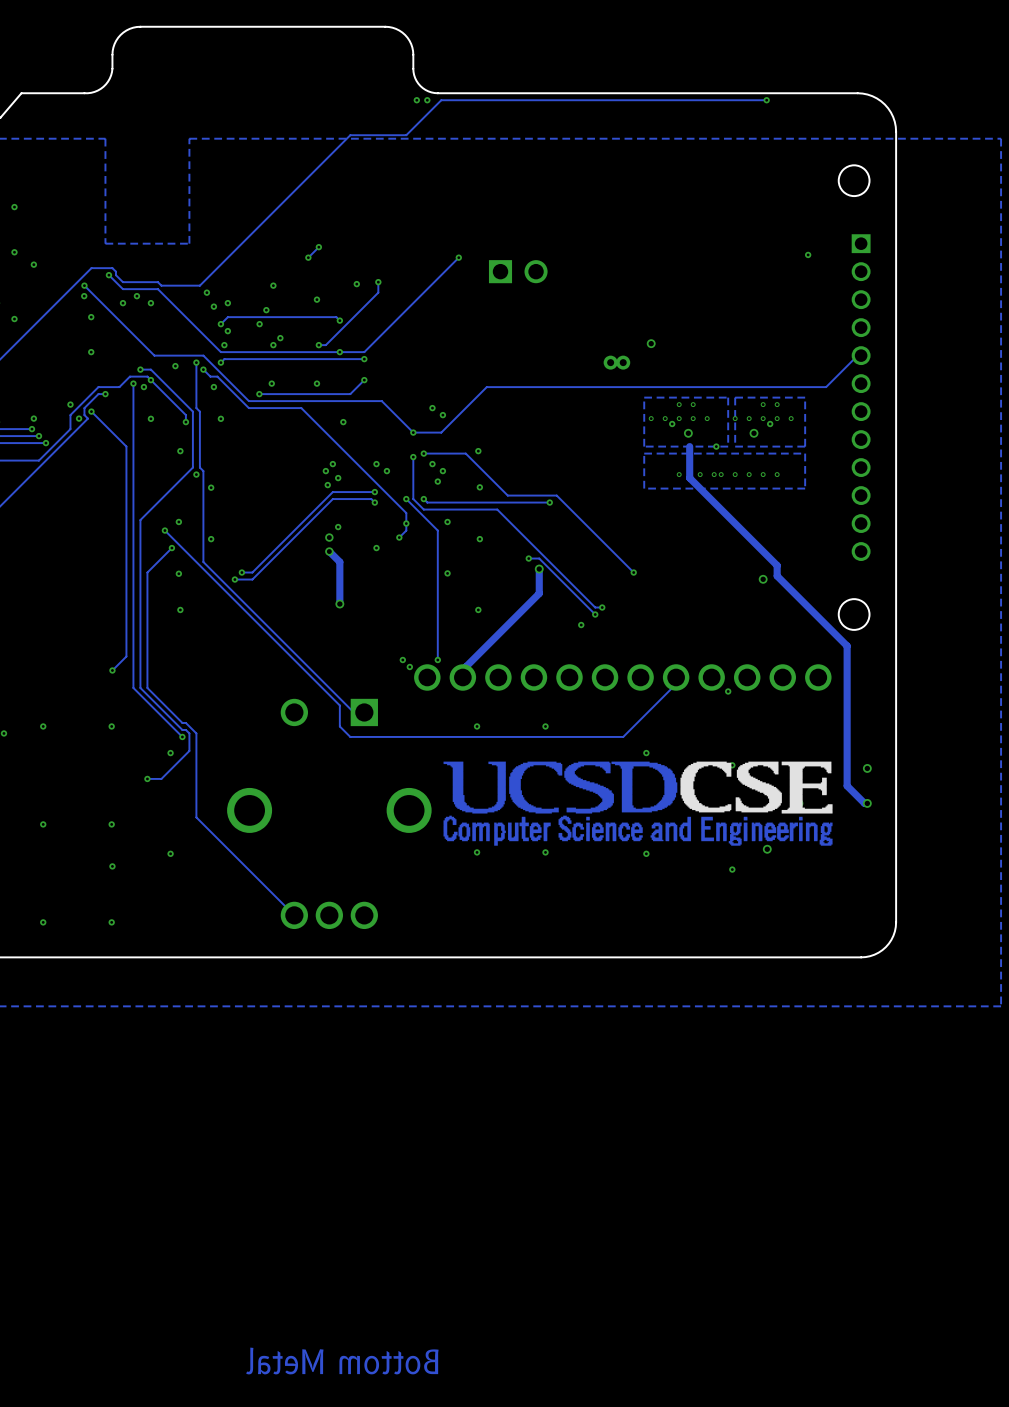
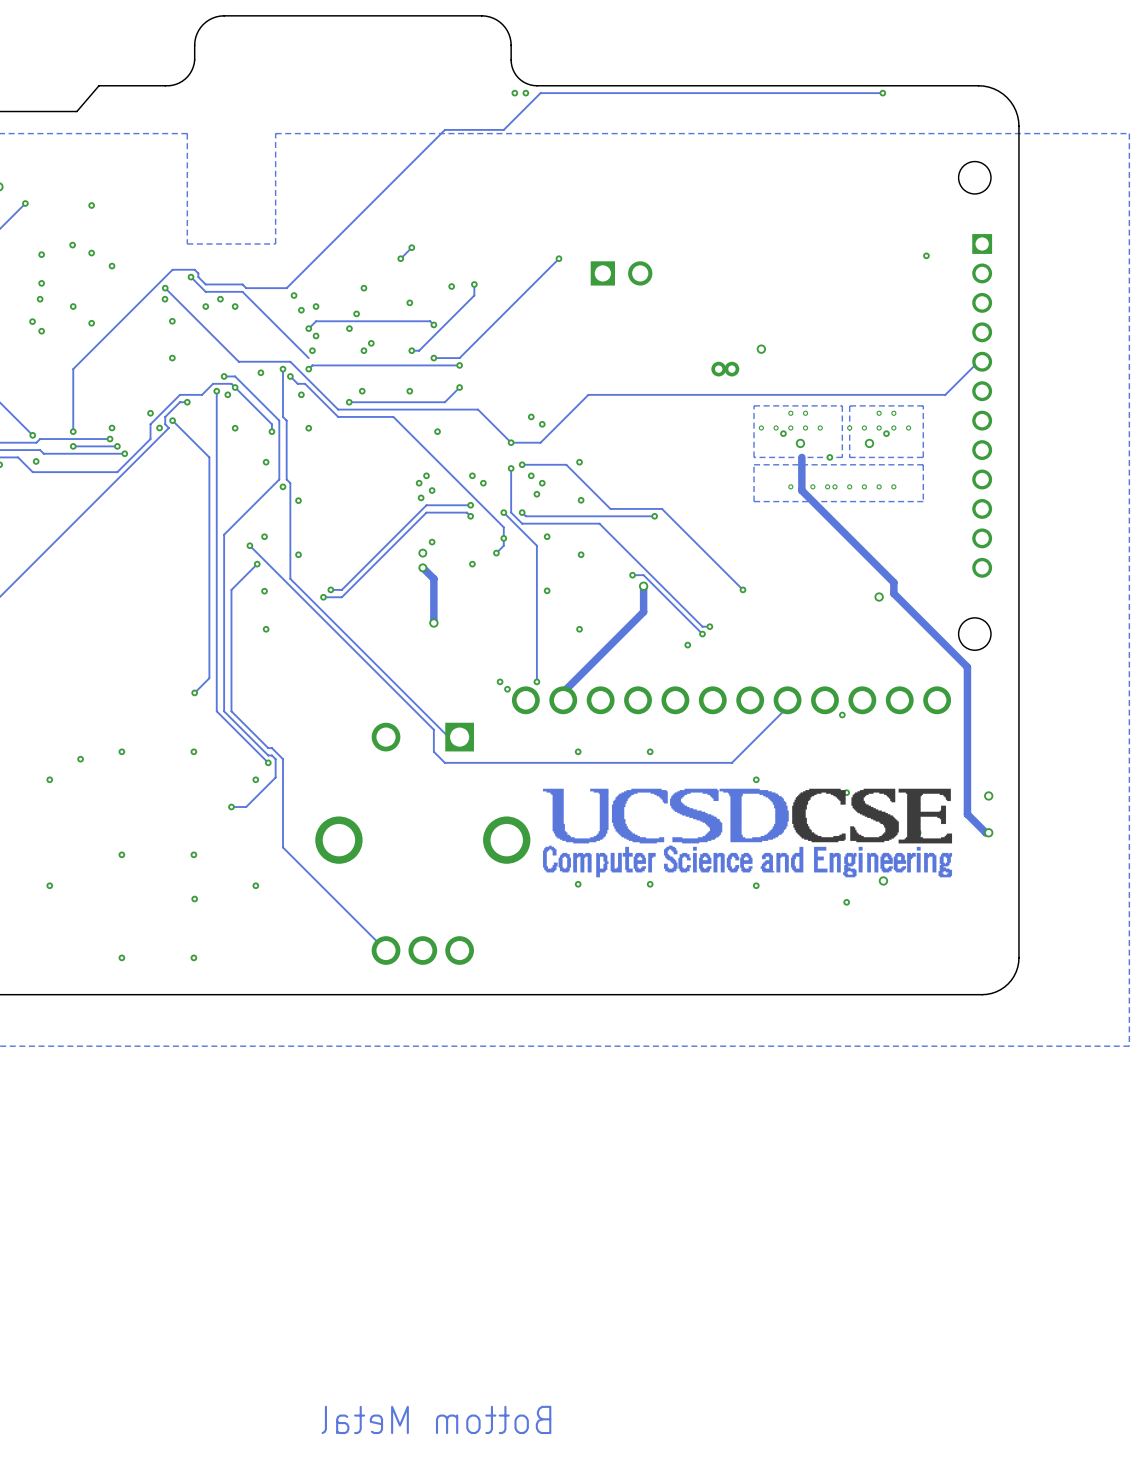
track: (339, 352) (220, 352) -> none

